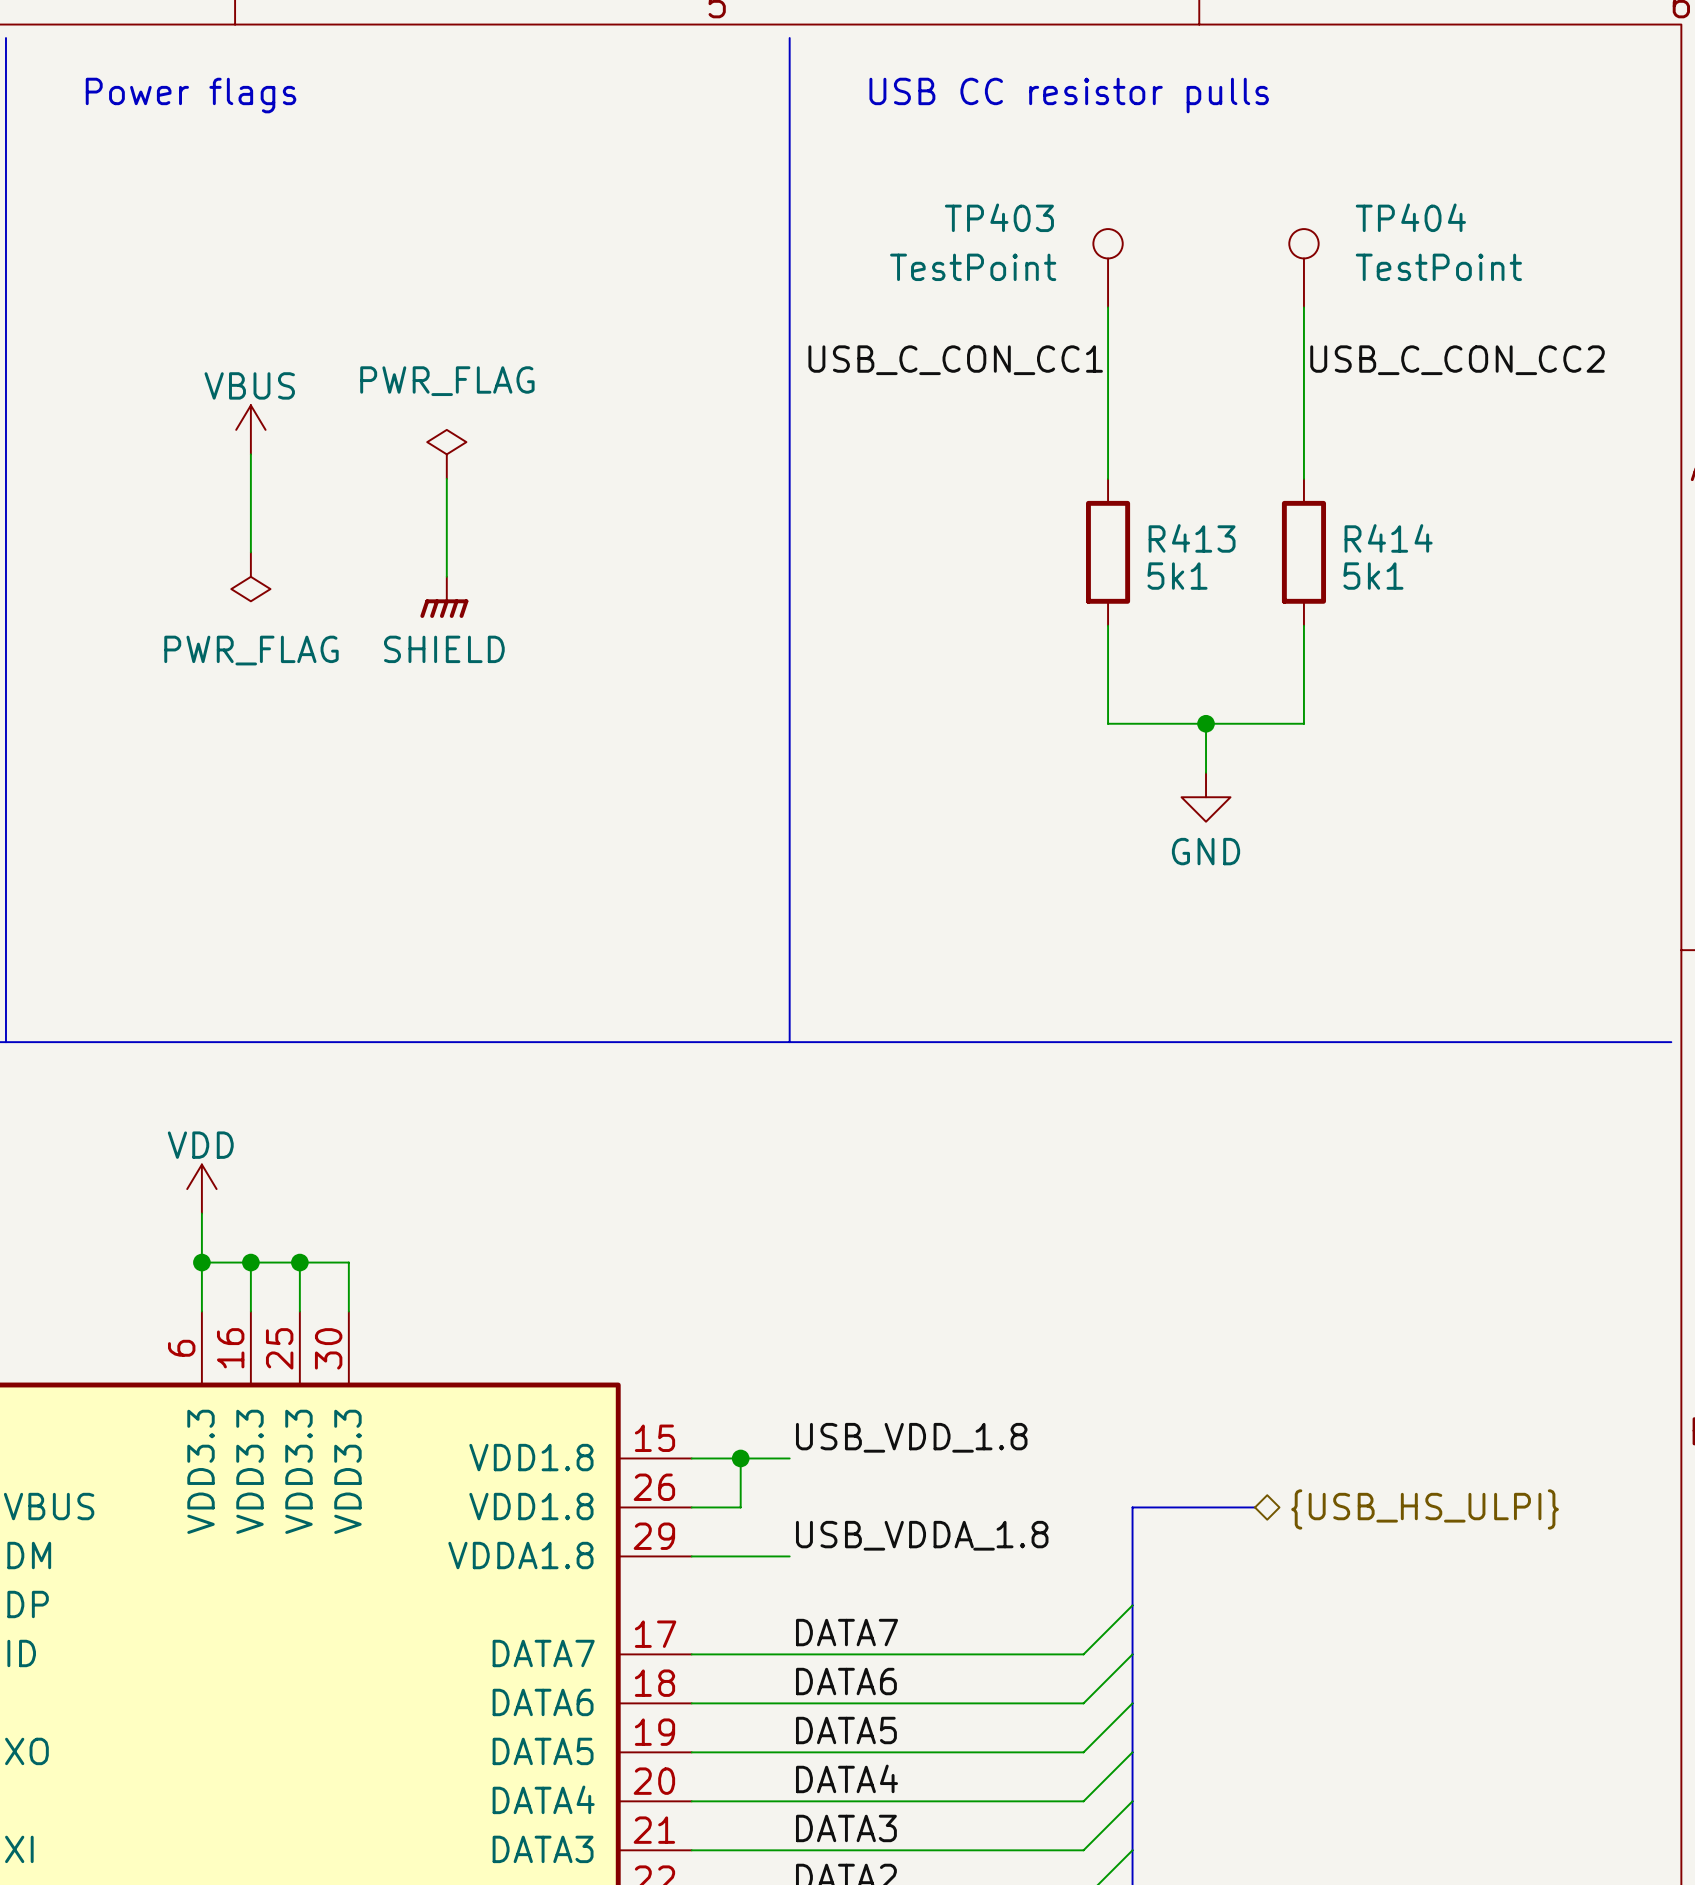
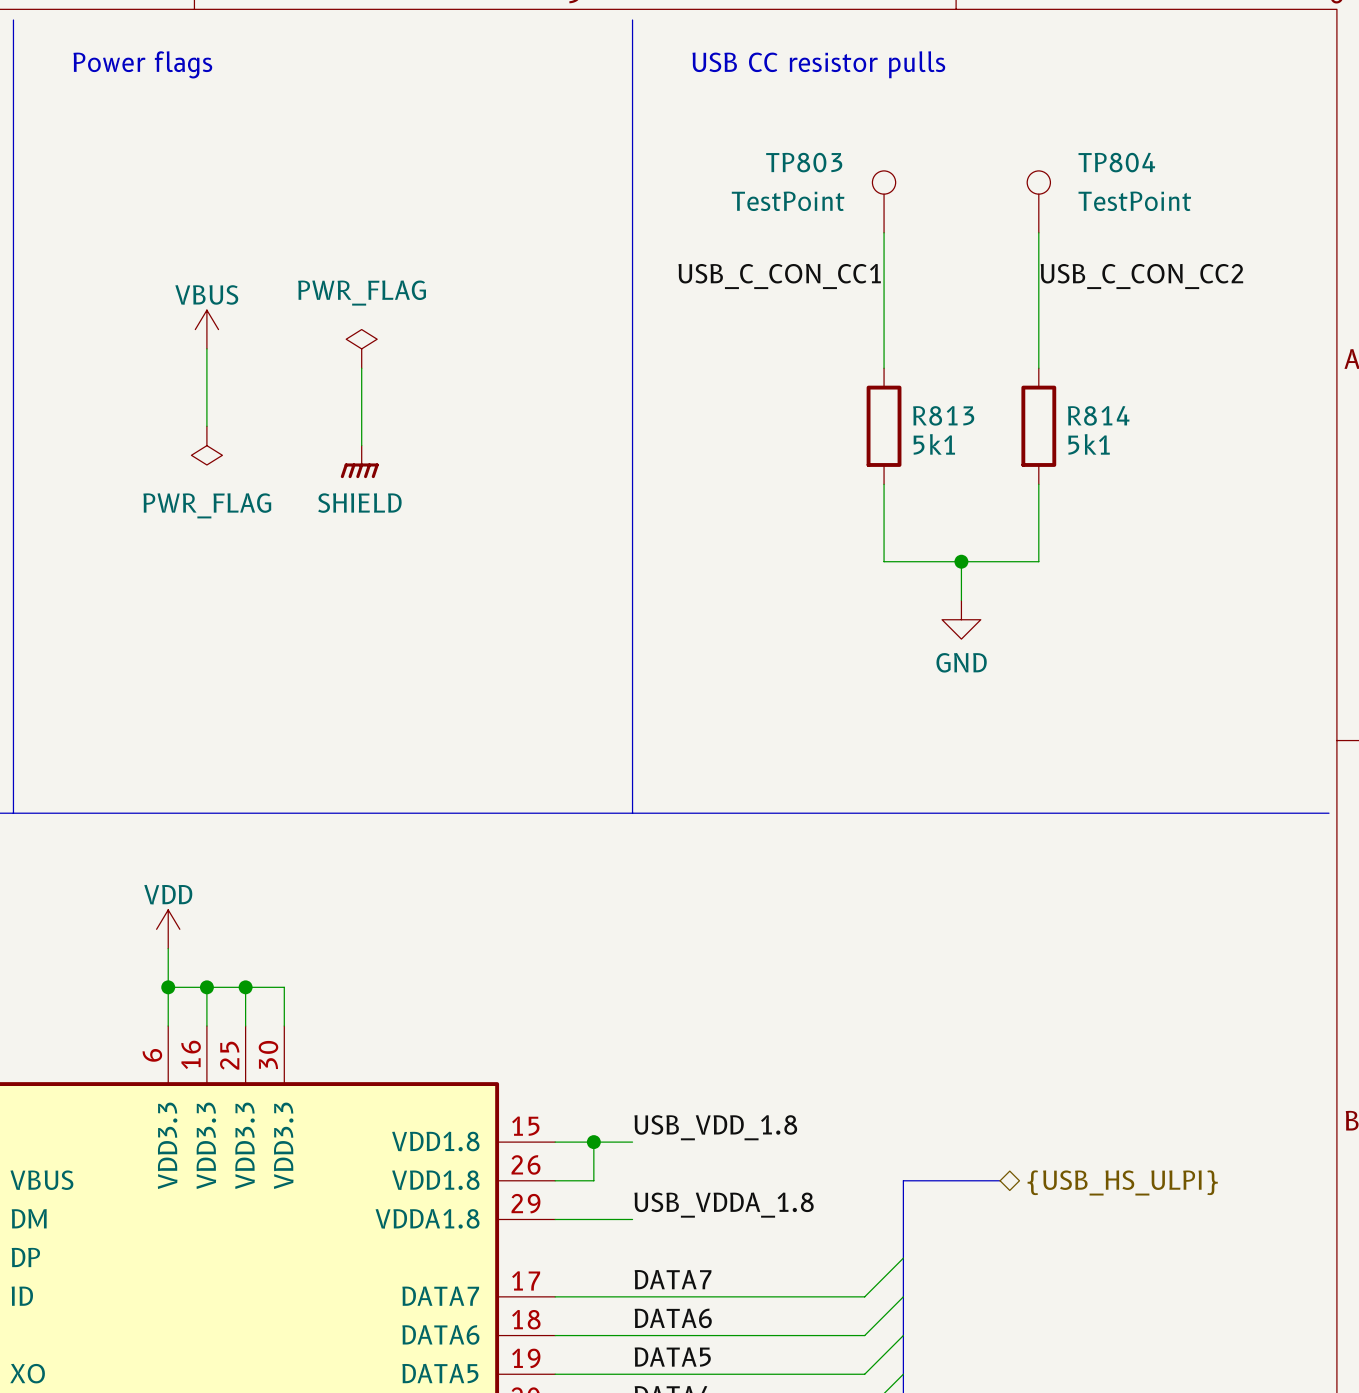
TP403 name: TP403 (999, 217) -> TP803 (804, 162)
TP404 name: TP404 (1410, 217) -> TP804 (1116, 162)
R413 name: R413 (1192, 538) -> R813 (943, 415)
R414 name: R414 (1388, 538) -> R814 (1098, 415)

